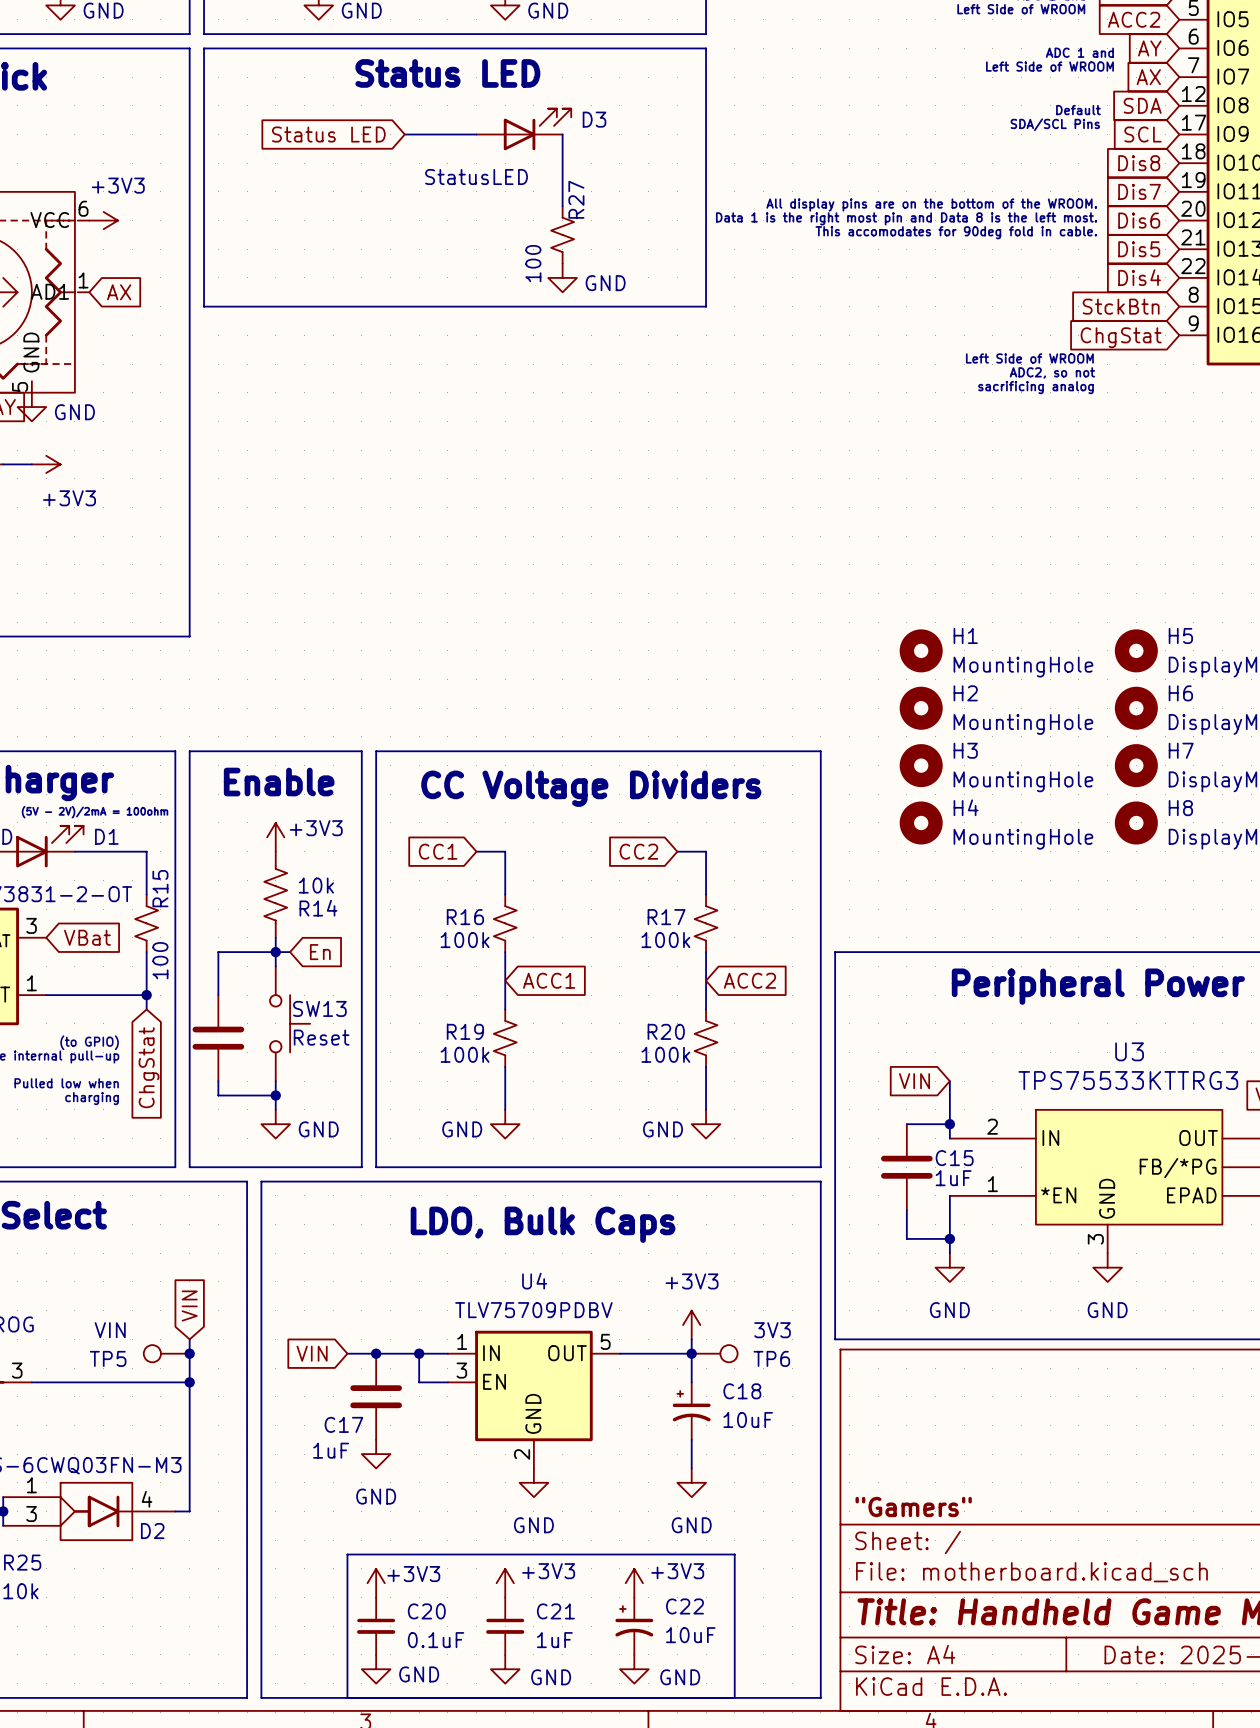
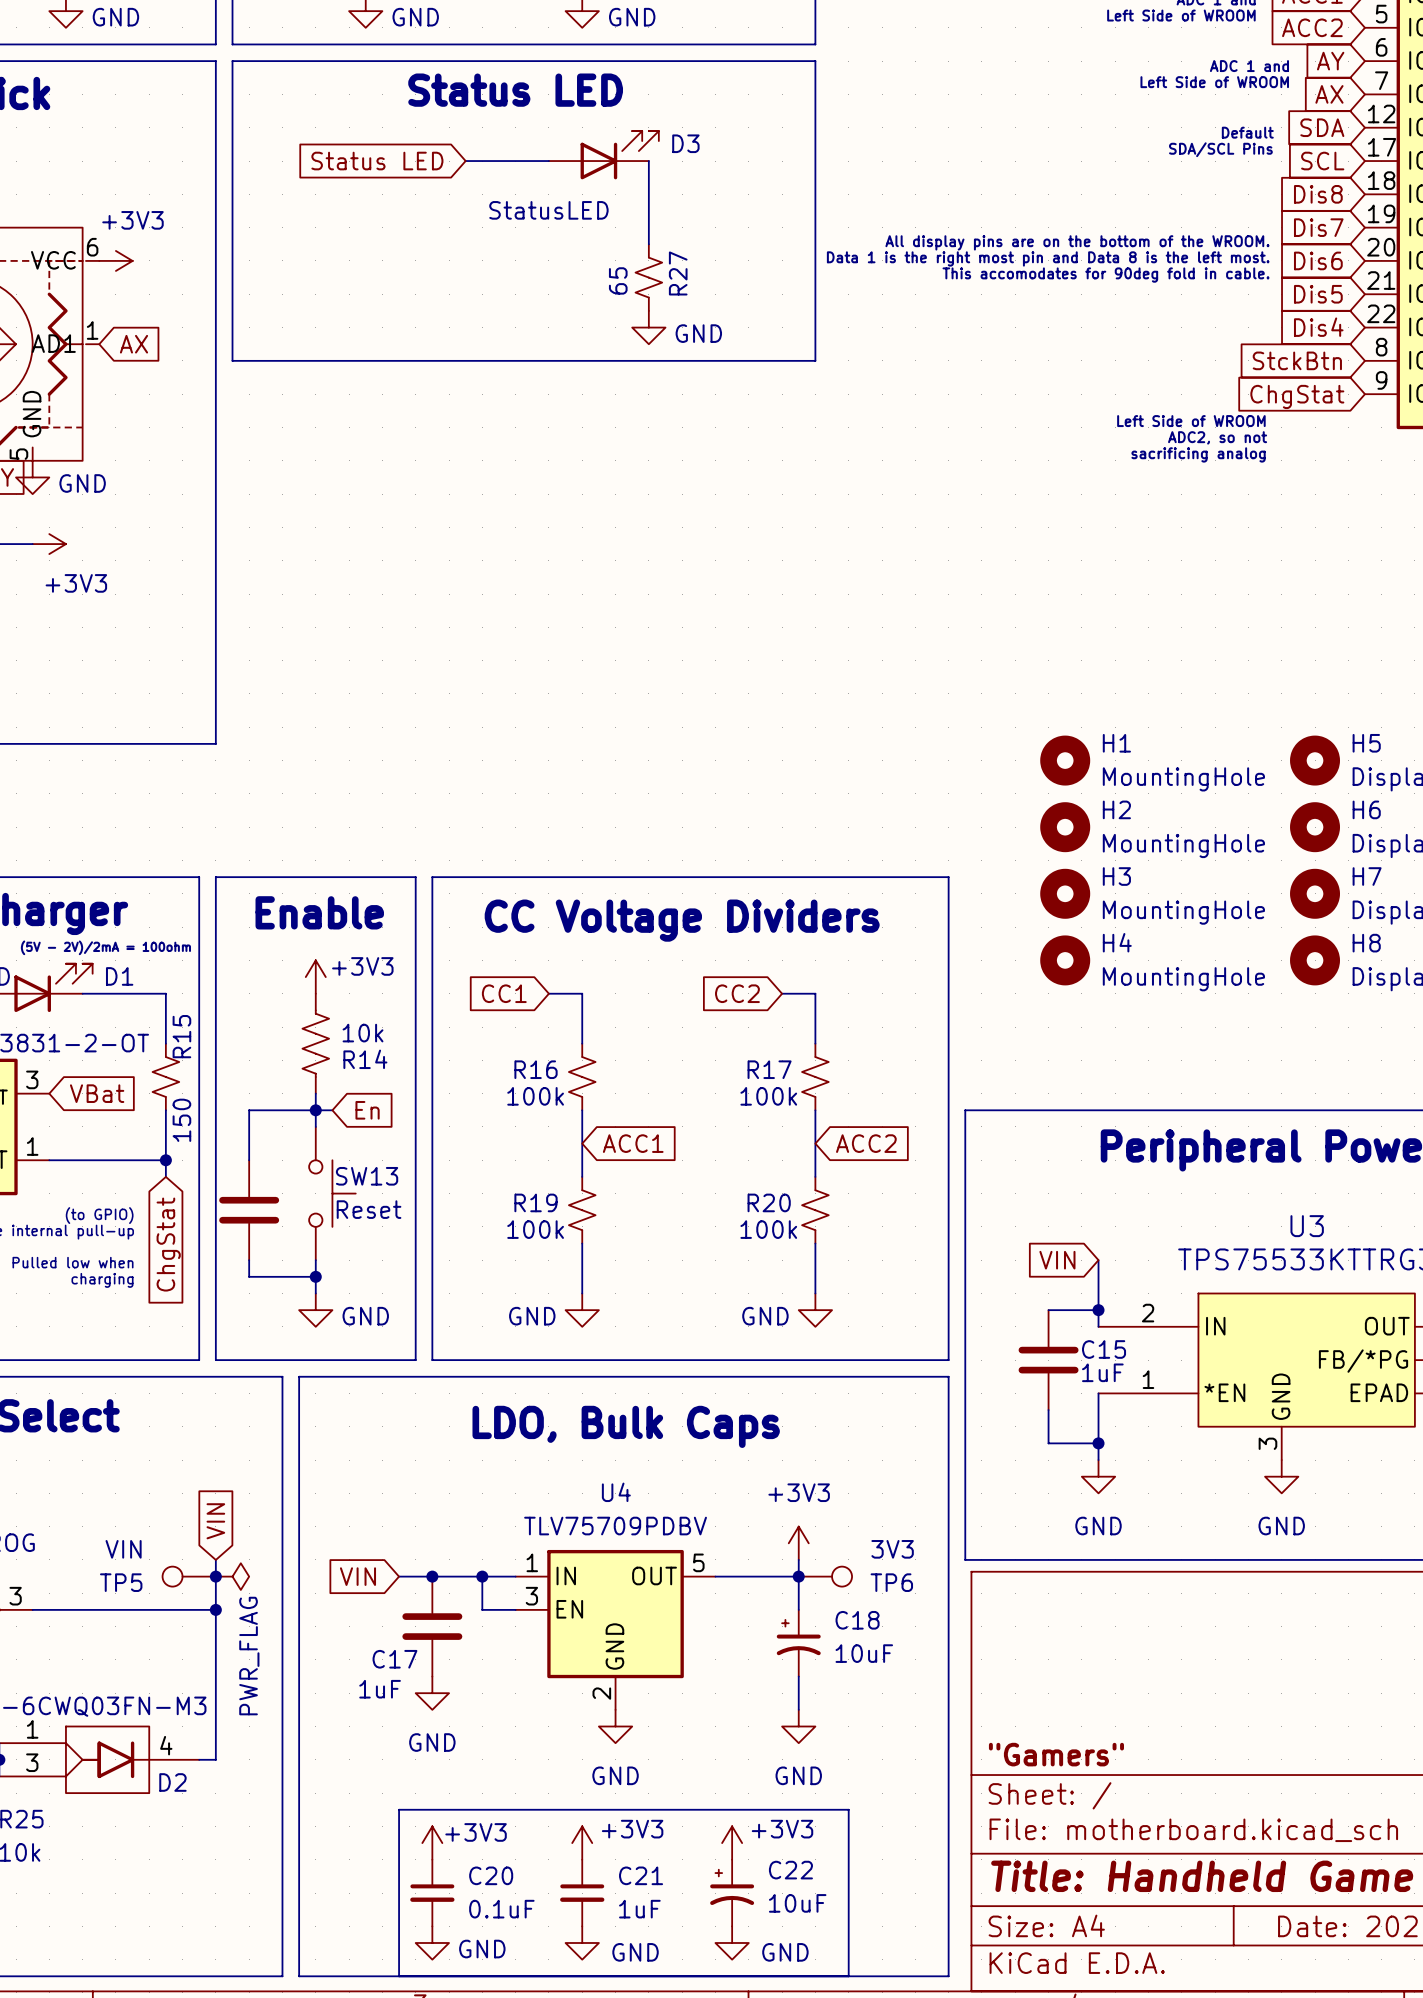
R27 name position: R27 (576, 199) -> R27 (678, 273)
R27 value: 100 (533, 263) -> 65 (618, 280)
R15 value: 100 (160, 960) -> 150 (181, 1120)
power symbol: none -> PWR_FLAG (232, 1576)

